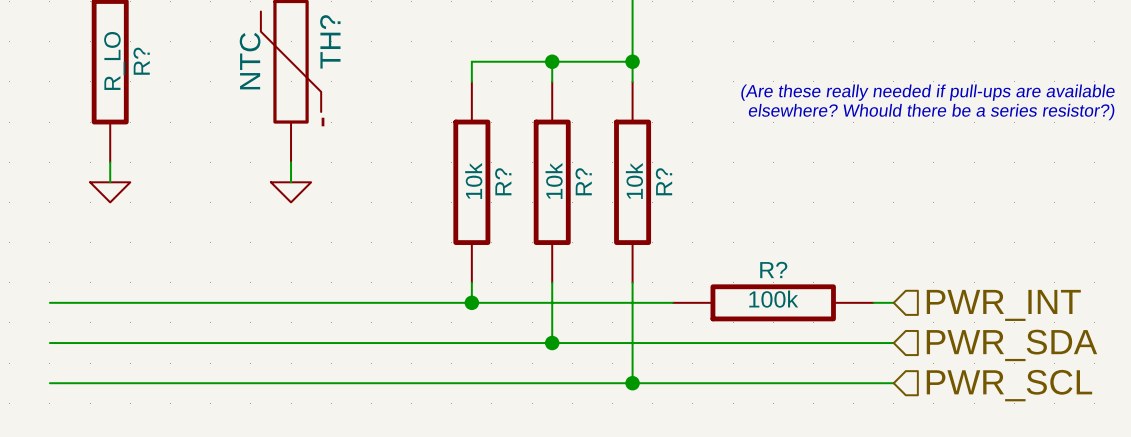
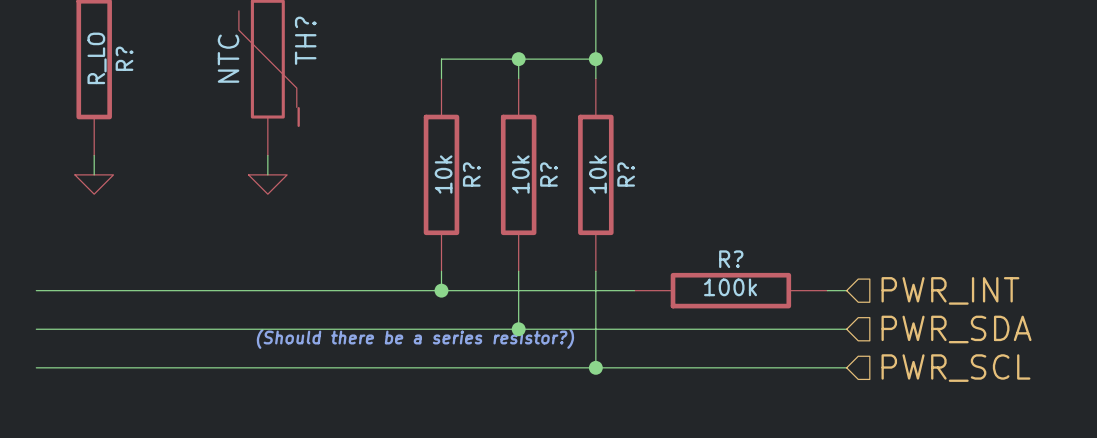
text: (Are these really needed if pull-ups are available (928, 92) -> none
text: elsewhere? Whould there be a series resistor?) (931, 112) -> none
text: none -> (Should there be a series resistor?) (415, 338)

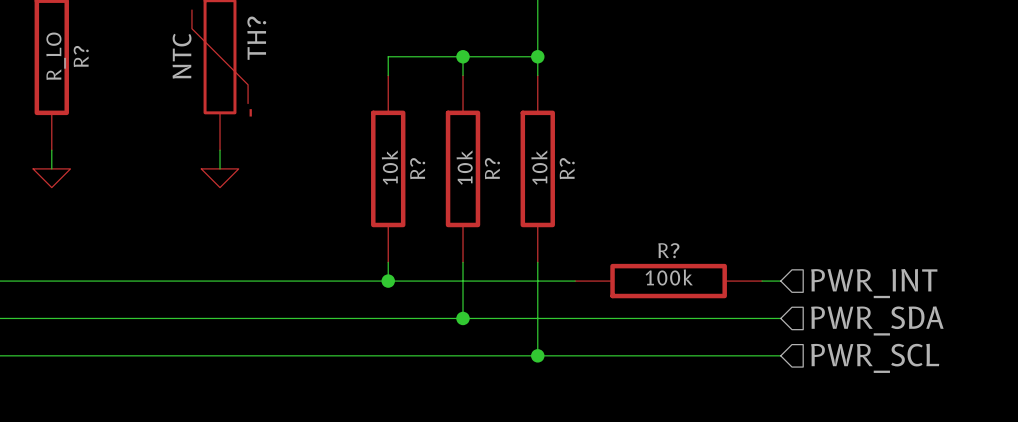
text: (Should there be a series resistor?) (415, 338) -> none

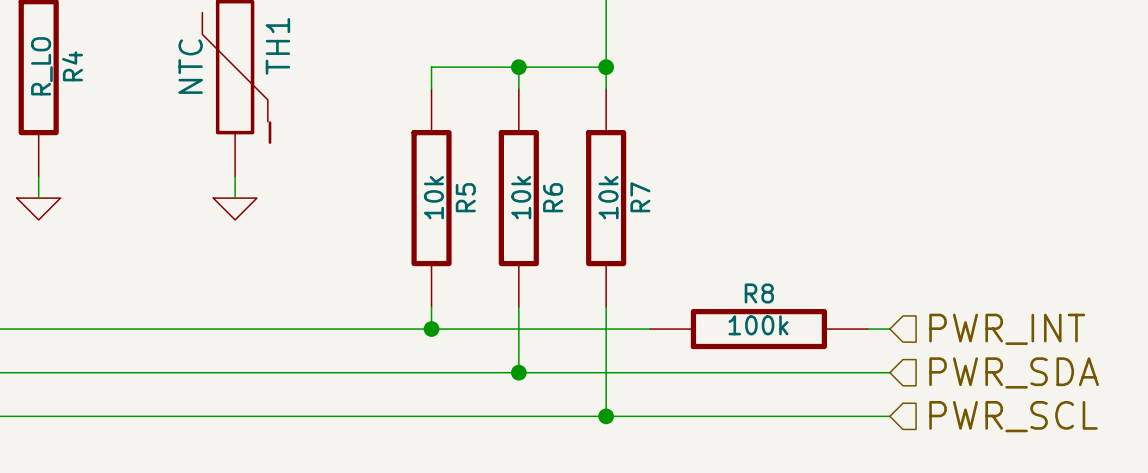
TH? name: TH? (256, 38) -> TH1 (277, 46)
R? name: R? (81, 56) -> R4 (72, 66)
R? name: R? (417, 168) -> R5 (465, 197)
R? name: R? (492, 168) -> R6 (553, 197)
R? name: R? (567, 168) -> R7 (640, 197)
R? name: R? (668, 250) -> R8 (759, 293)

